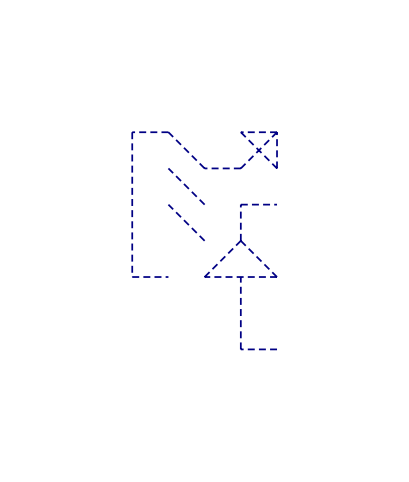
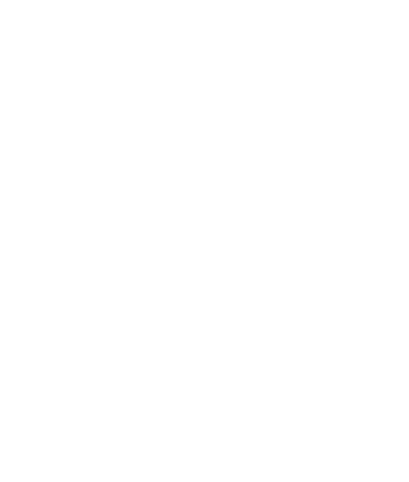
line: (277, 132) (240, 132) (277, 168) (277, 132) -> none
line: (277, 132) (240, 168) (204, 168) (168, 132) (132, 132) (132, 277) (168, 277) -> none
line: (168, 168) (204, 204) -> none
line: (168, 204) (204, 240) -> none
line: (277, 204) (240, 204) (240, 240) -> none
line: (240, 240) (204, 277) (277, 277) (240, 240) -> none
line: (240, 277) (240, 349) (277, 349) -> none

